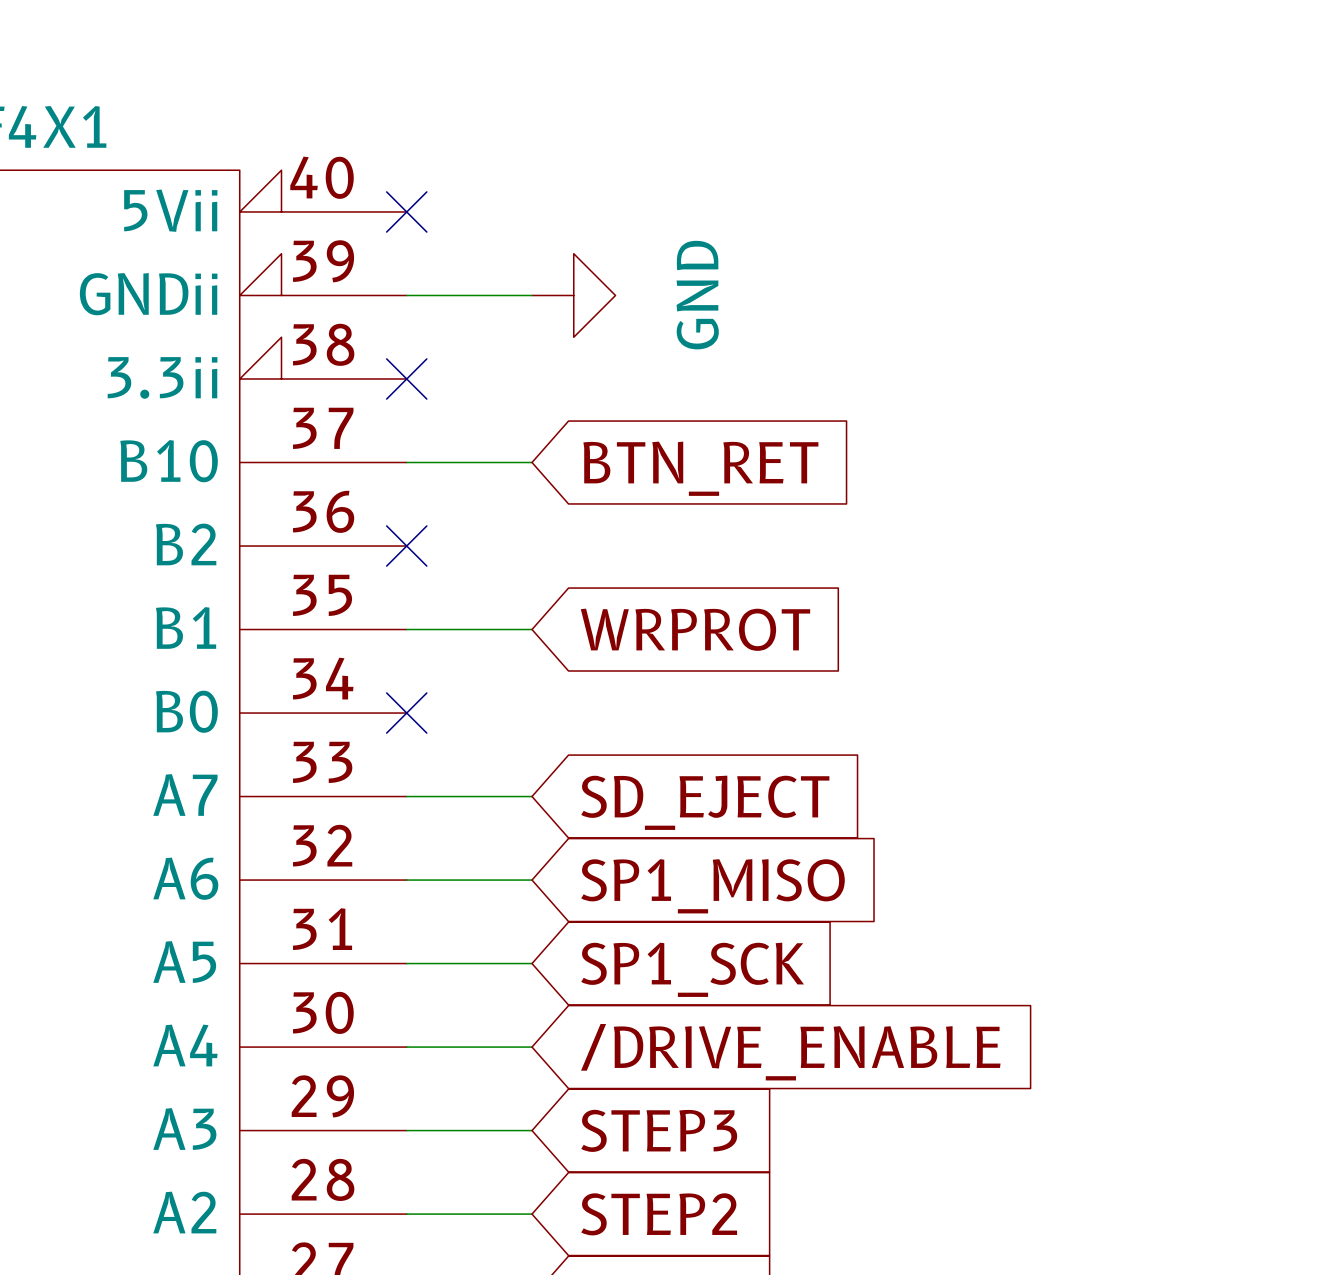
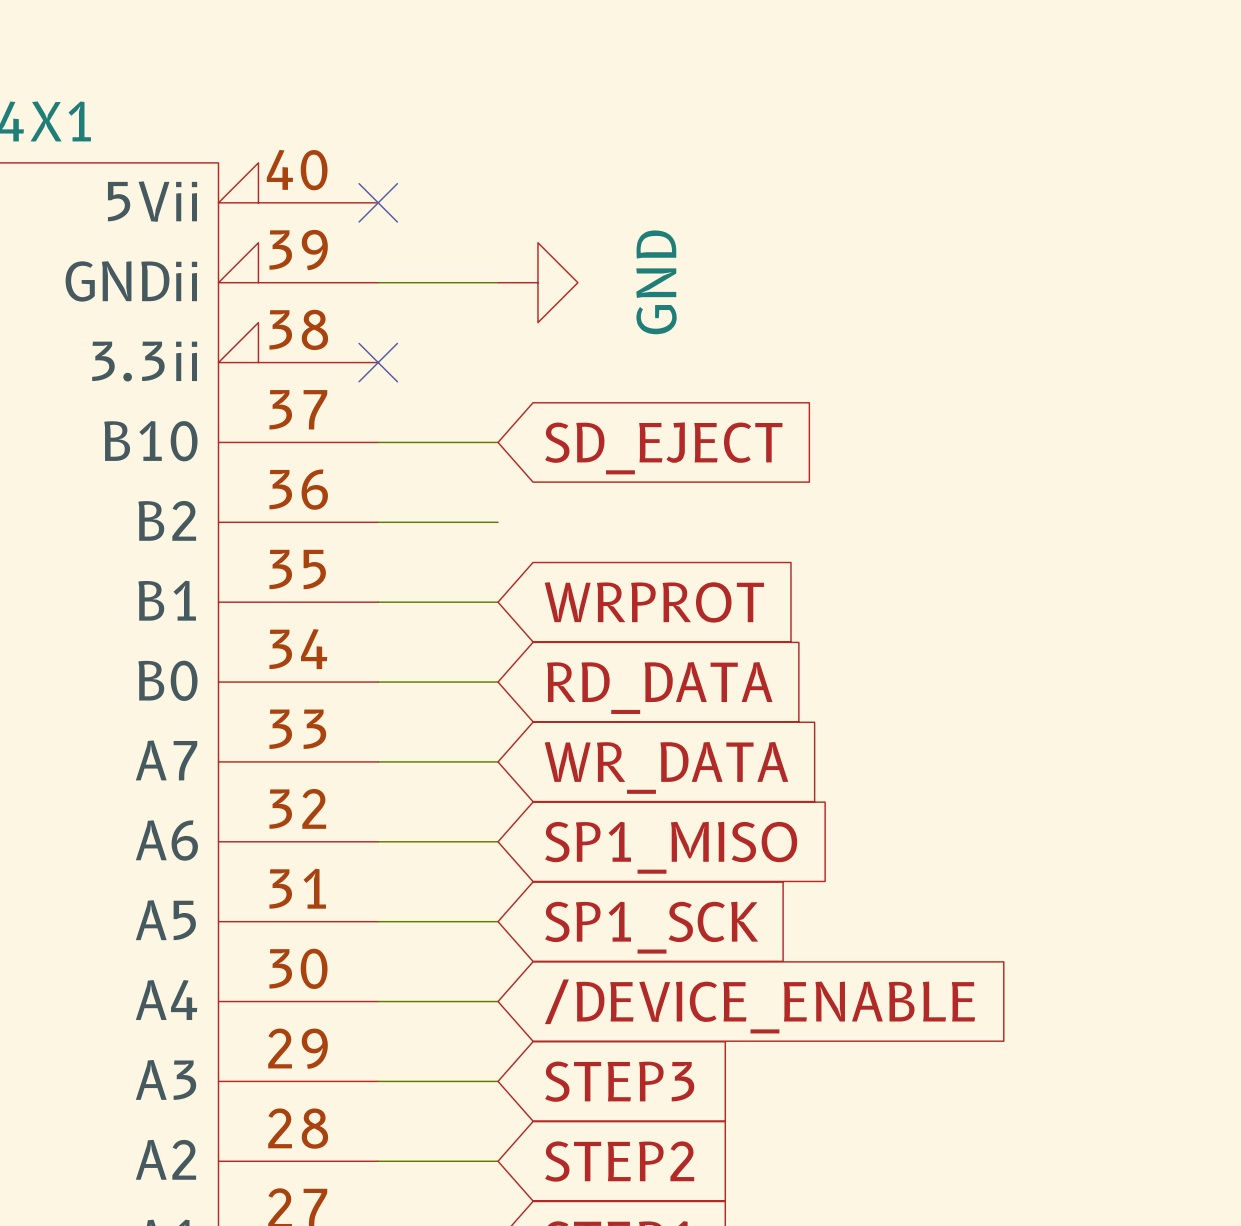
global label: BTN_RET (700, 468) -> SD_EJECT (663, 448)
wire: none -> (378, 522) (498, 522)
no-connect mark: (406, 546) -> none
wire: none -> (378, 682) (498, 682)
no-connect mark: (406, 713) -> none
global label: none -> RD_DATA (659, 688)
global label: SD_EJECT (705, 802) -> WR_DATA (666, 767)
global label: /DRIVE_ENABLE (790, 1052) -> /DEVICE_ENABLE (759, 1006)

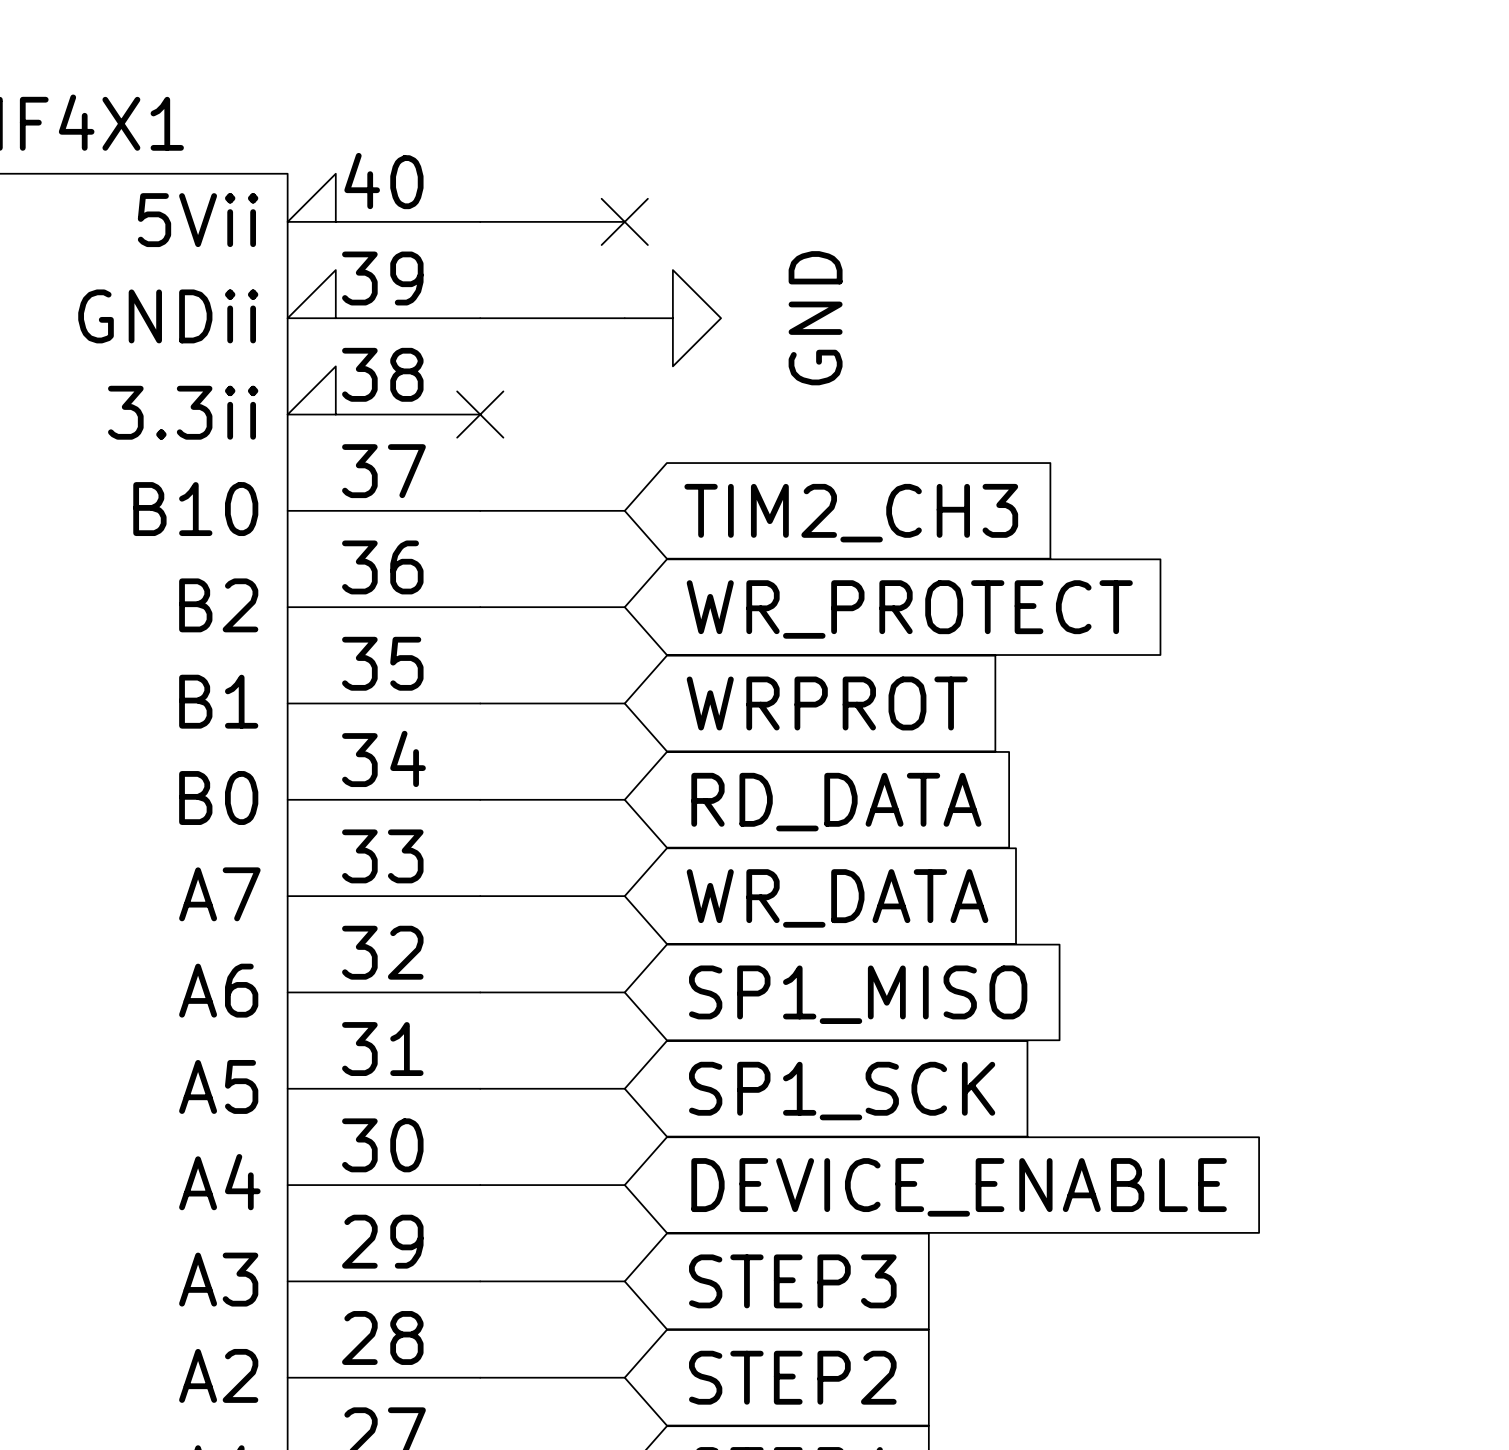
wire: none -> (480, 221) (624, 221)
no-connect mark position: (378, 202) -> (624, 221)
global label: SD_EJECT (663, 448) -> TIM2_CH3 (851, 513)
global label: none -> WR_PROTECT (909, 609)
global label: /DEVICE_ENABLE (759, 1006) -> DEVICE_ENABLE (959, 1187)

